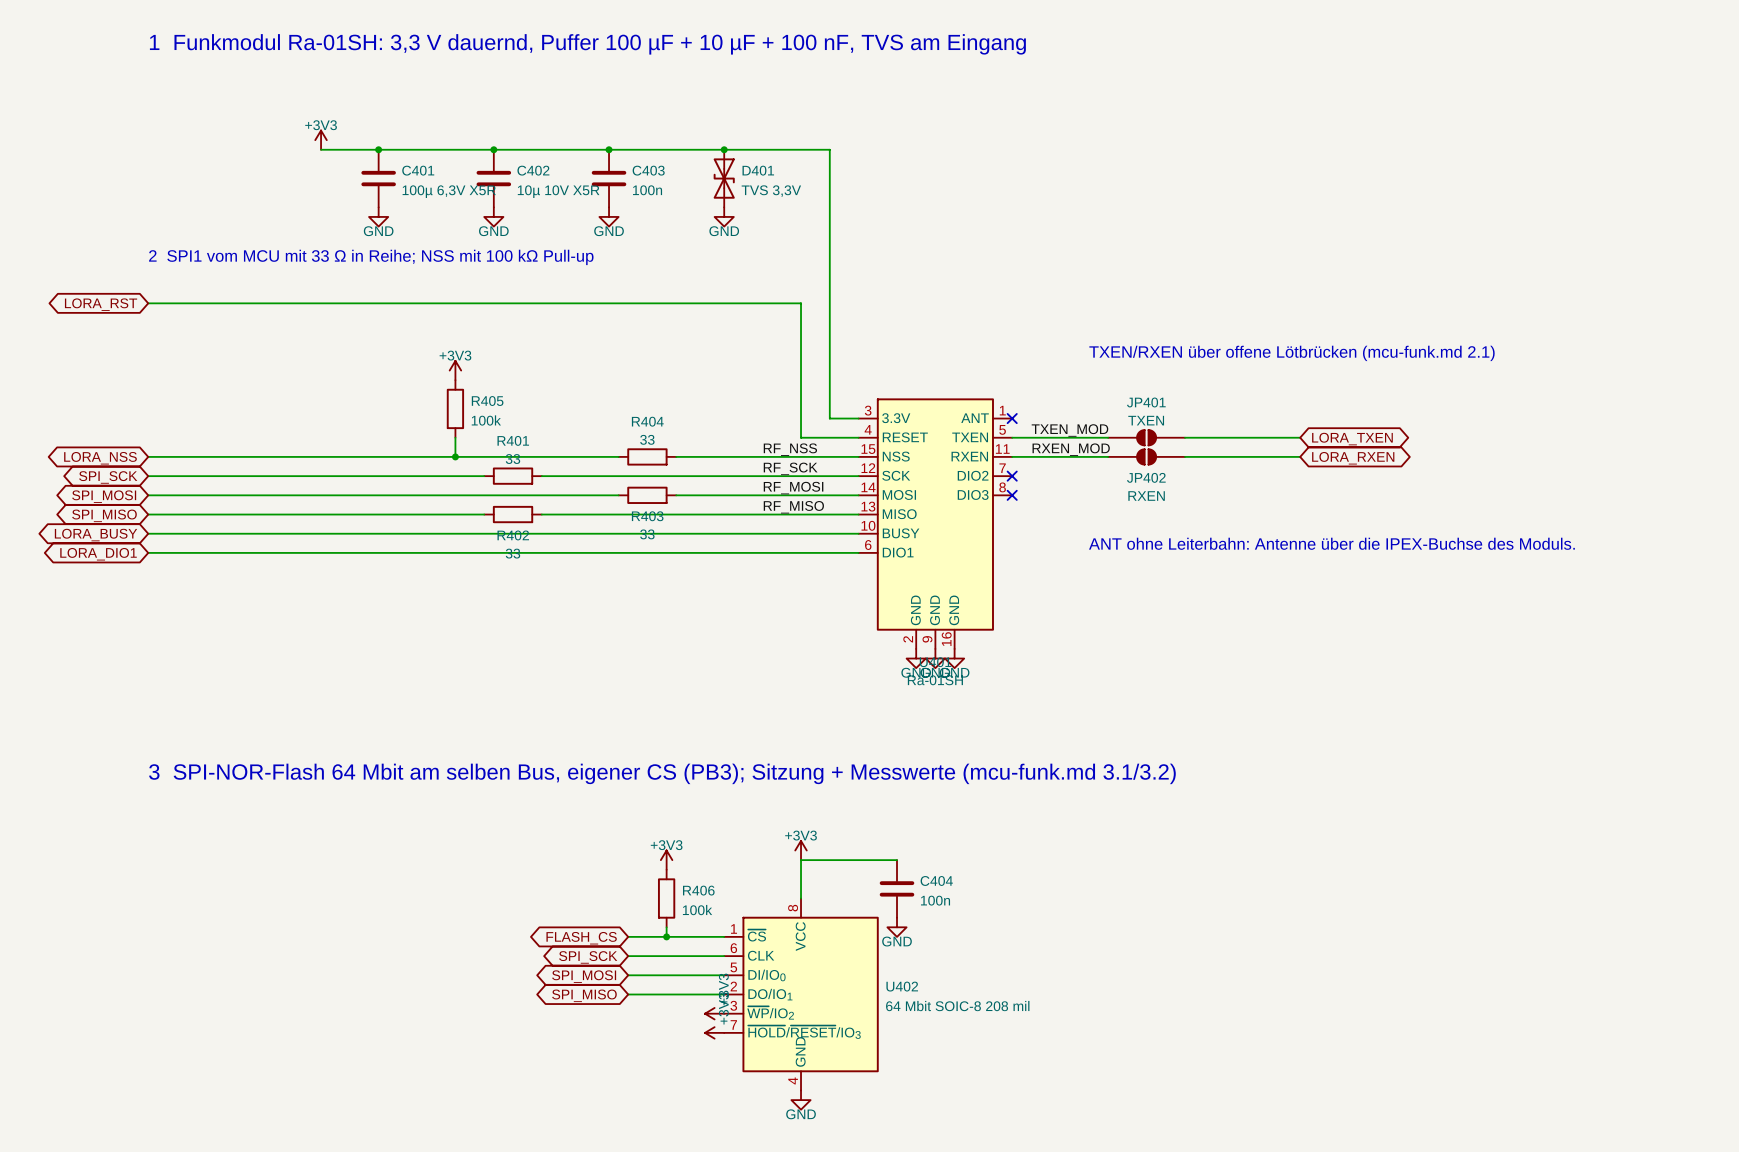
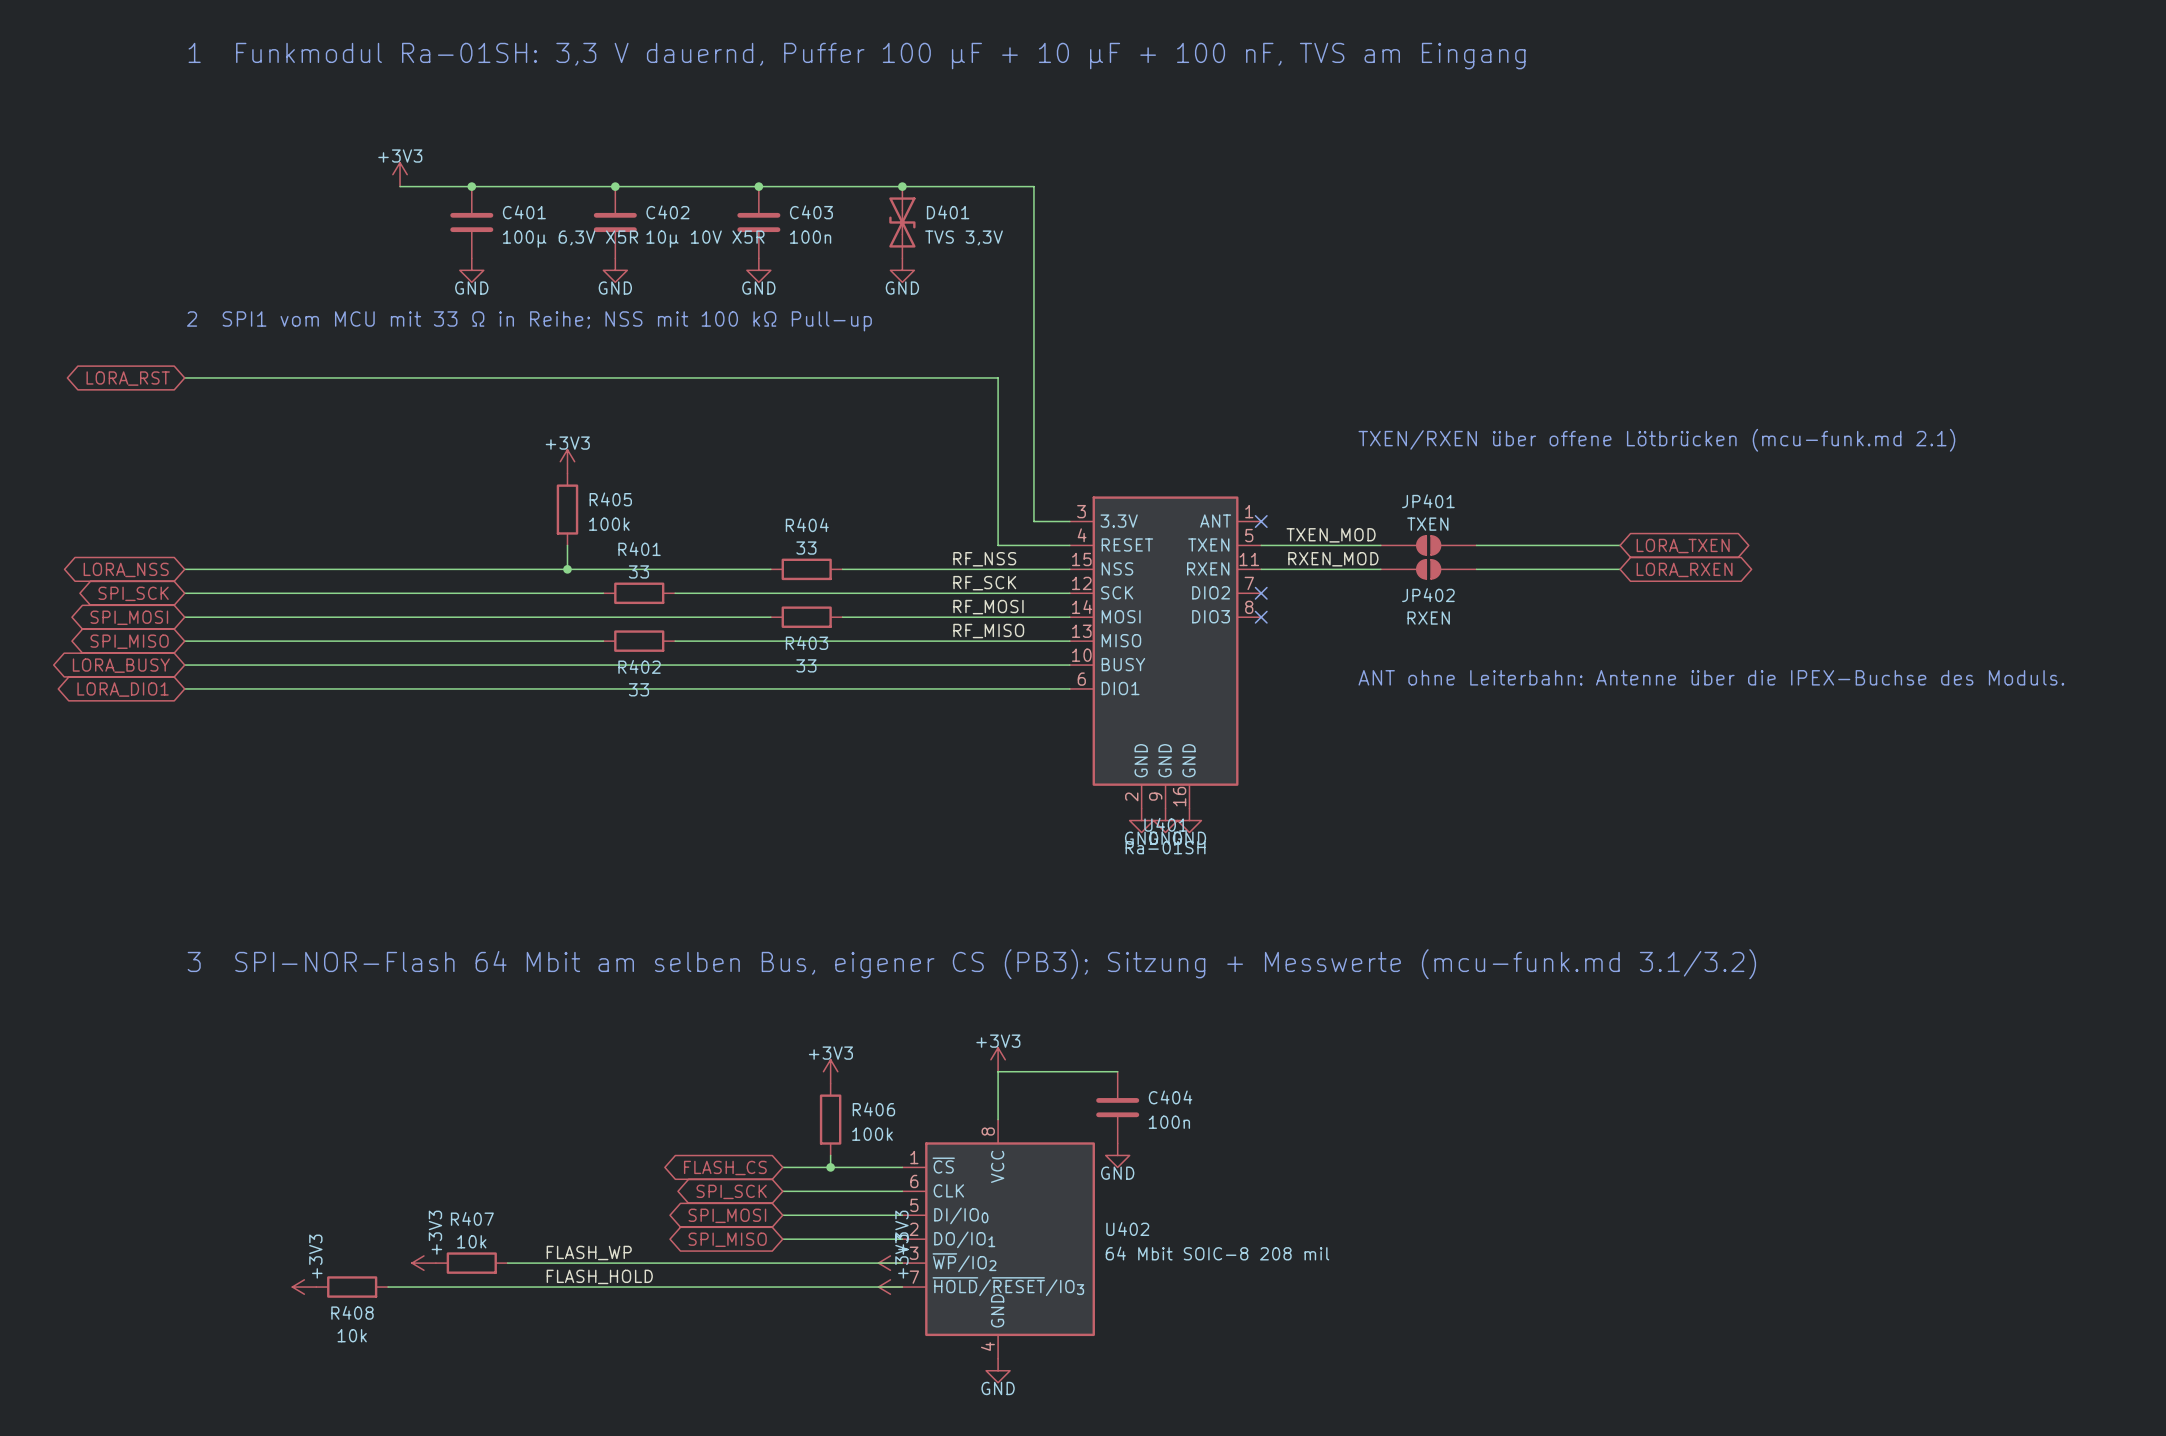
label: none -> FLASH_WP (589, 1253)
power symbol: none -> +3V3 (423, 1263)
R407: none -> 10k (471, 1263)
wire: none -> (507, 1263) (902, 1263)
label: none -> FLASH_HOLD (599, 1276)
power symbol: none -> +3V3 (304, 1287)
R408: none -> 10k (352, 1287)
wire: none -> (388, 1287) (902, 1287)

